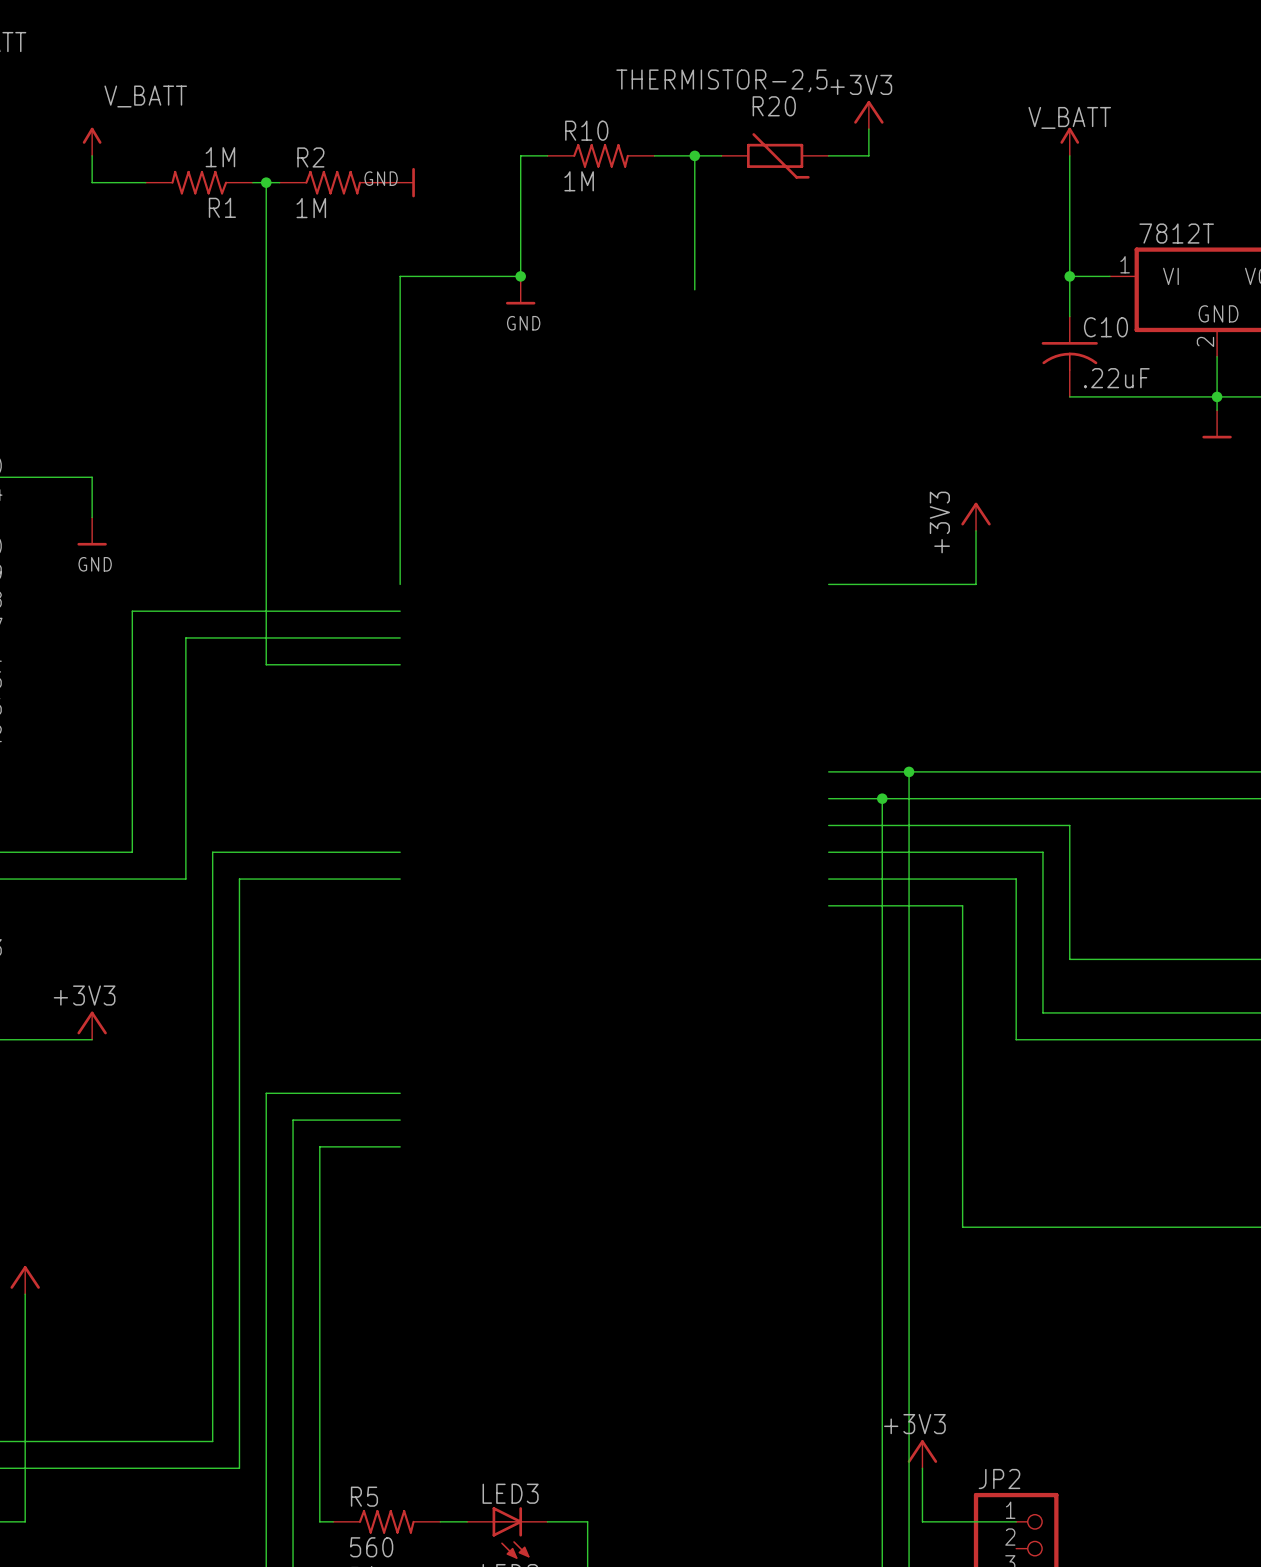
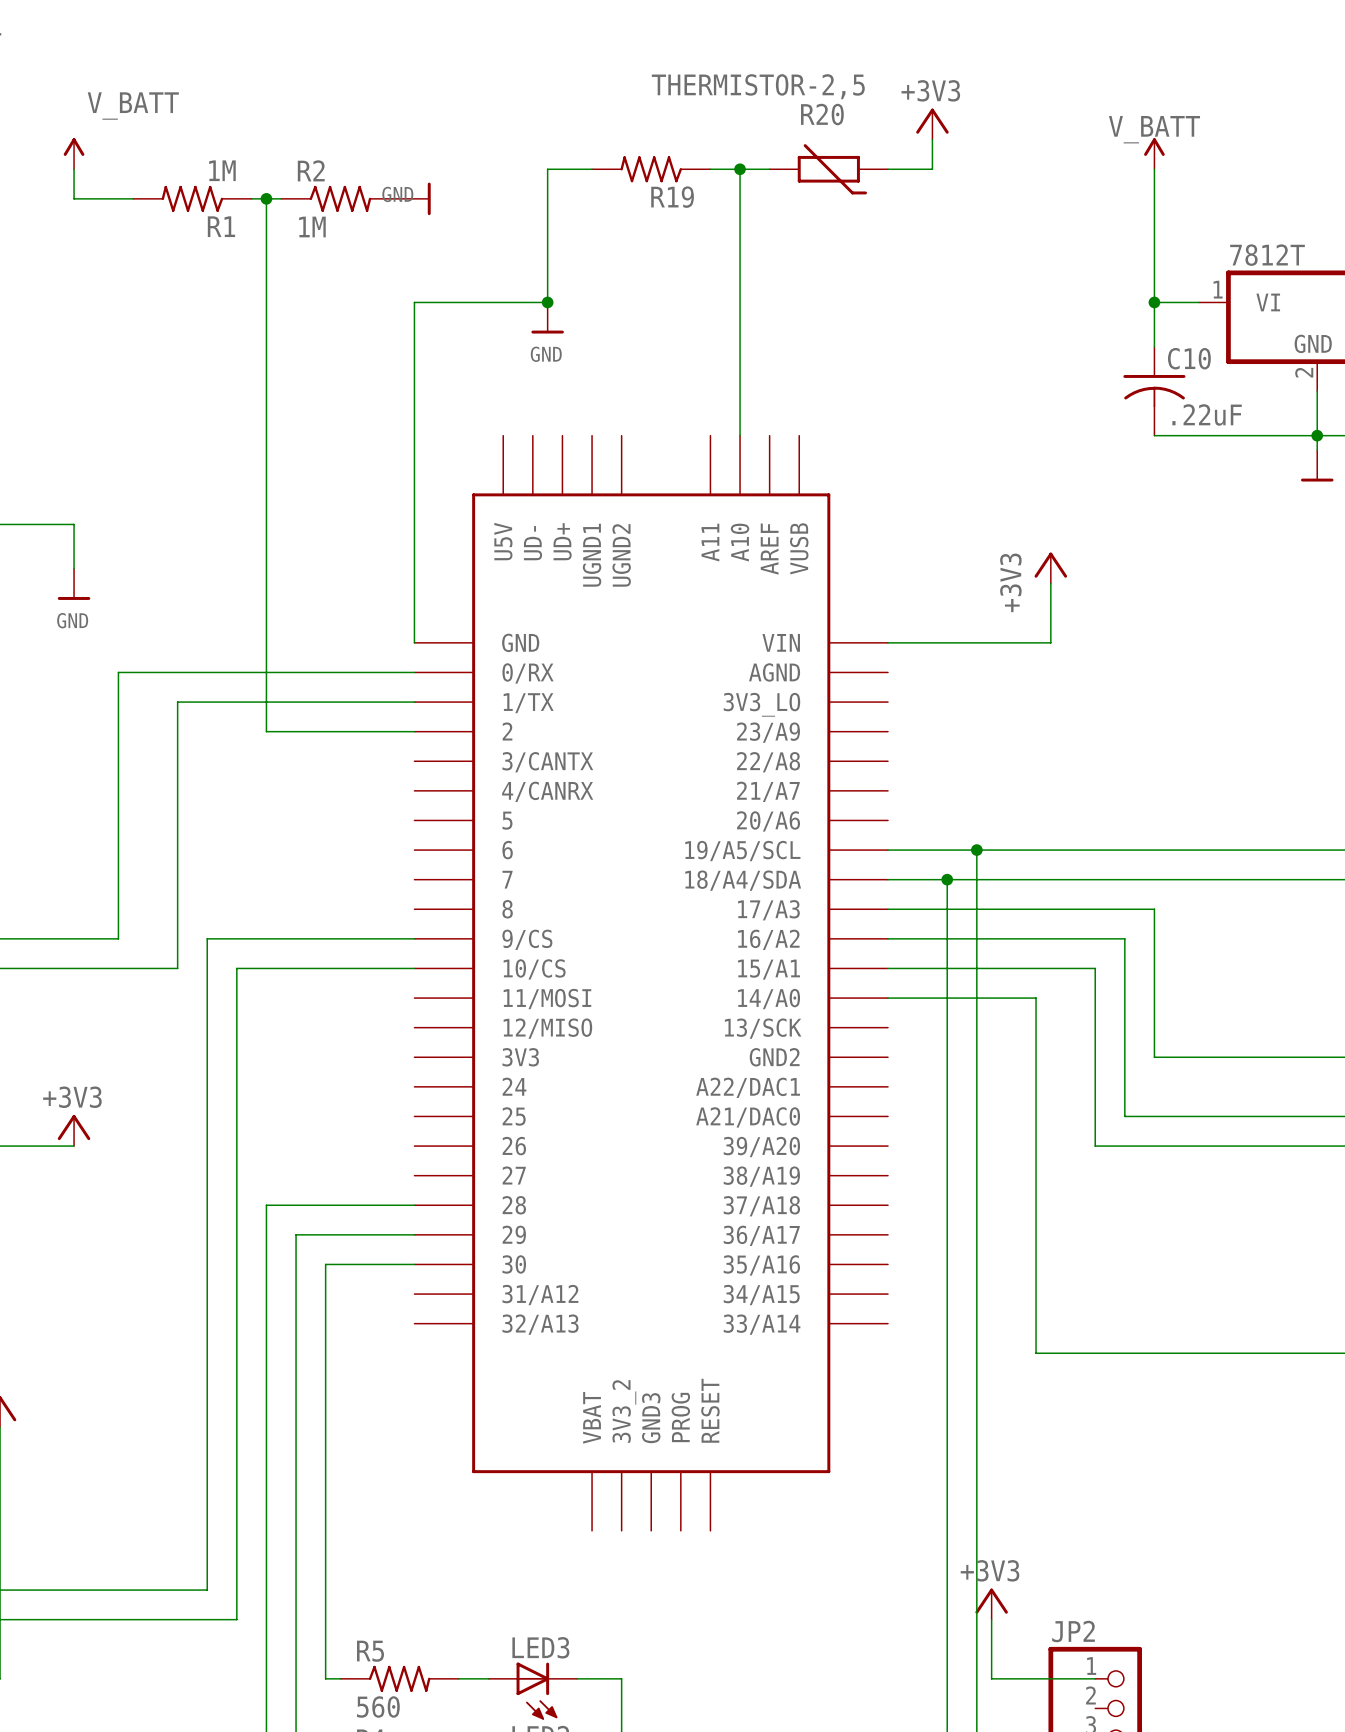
R10: 1M (601, 155) -> none
R19: none -> (651, 169)
wire: none -> (740, 317) (740, 435)
part: none -> (651, 983)

